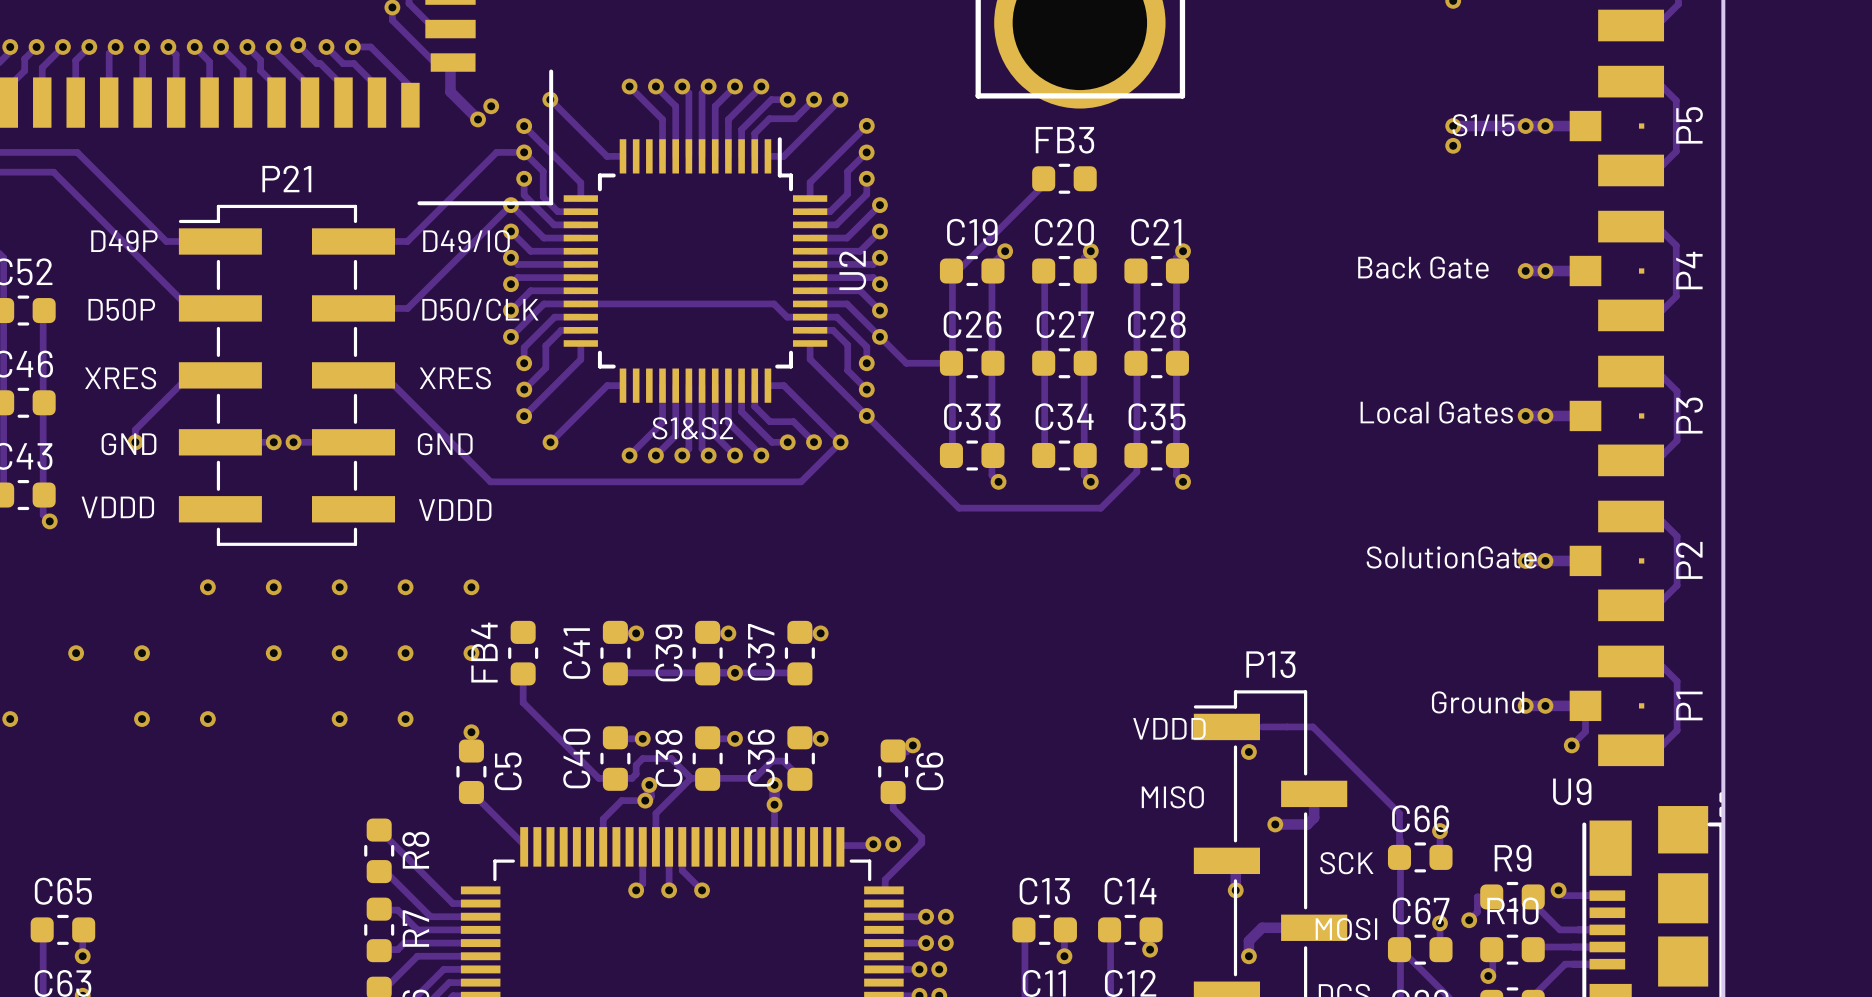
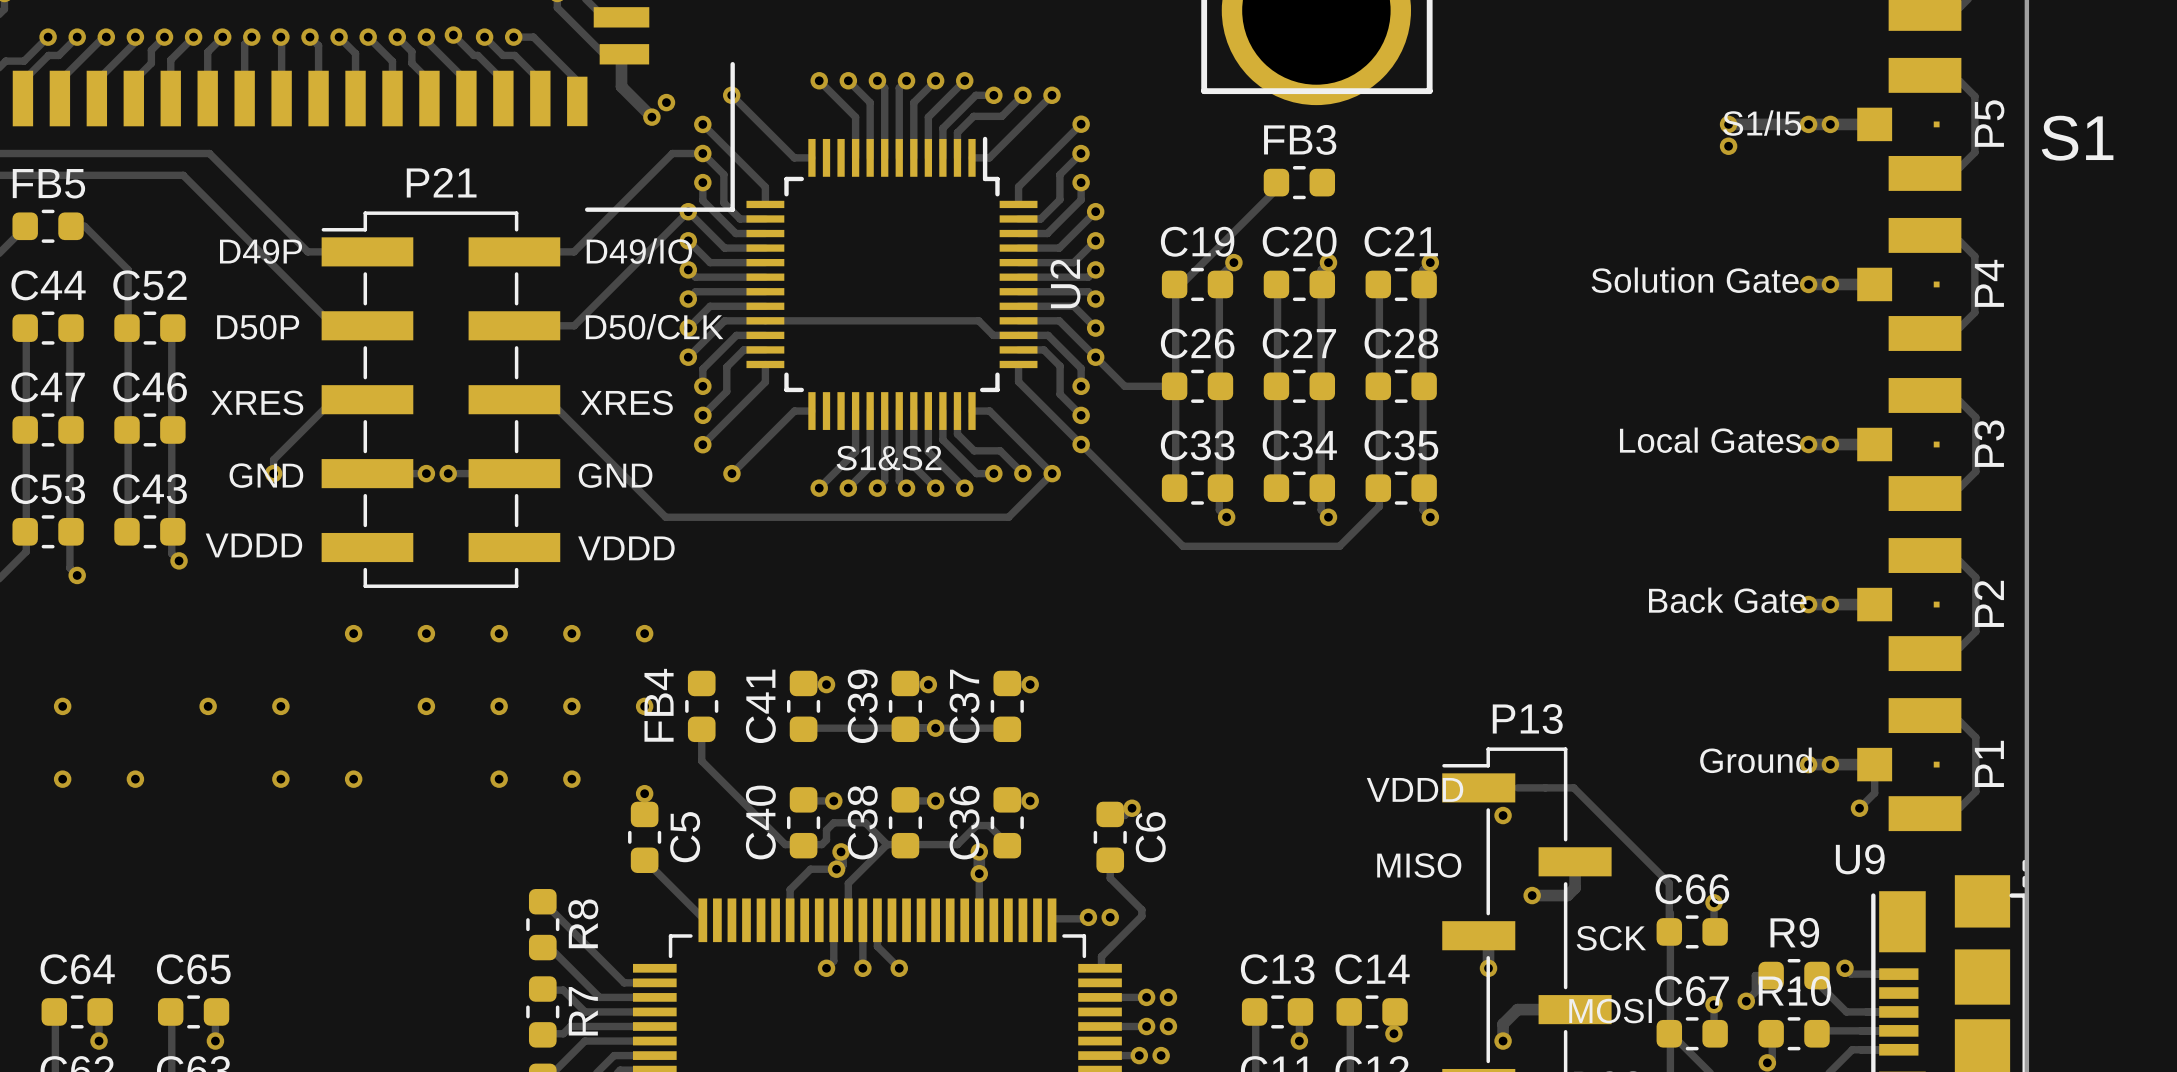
text: none -> S1 (2077, 138)
text: Back Gate (1423, 267) -> Solution Gate (1695, 280)
text: SolutionGate (1451, 557) -> Back Gate (1727, 600)

